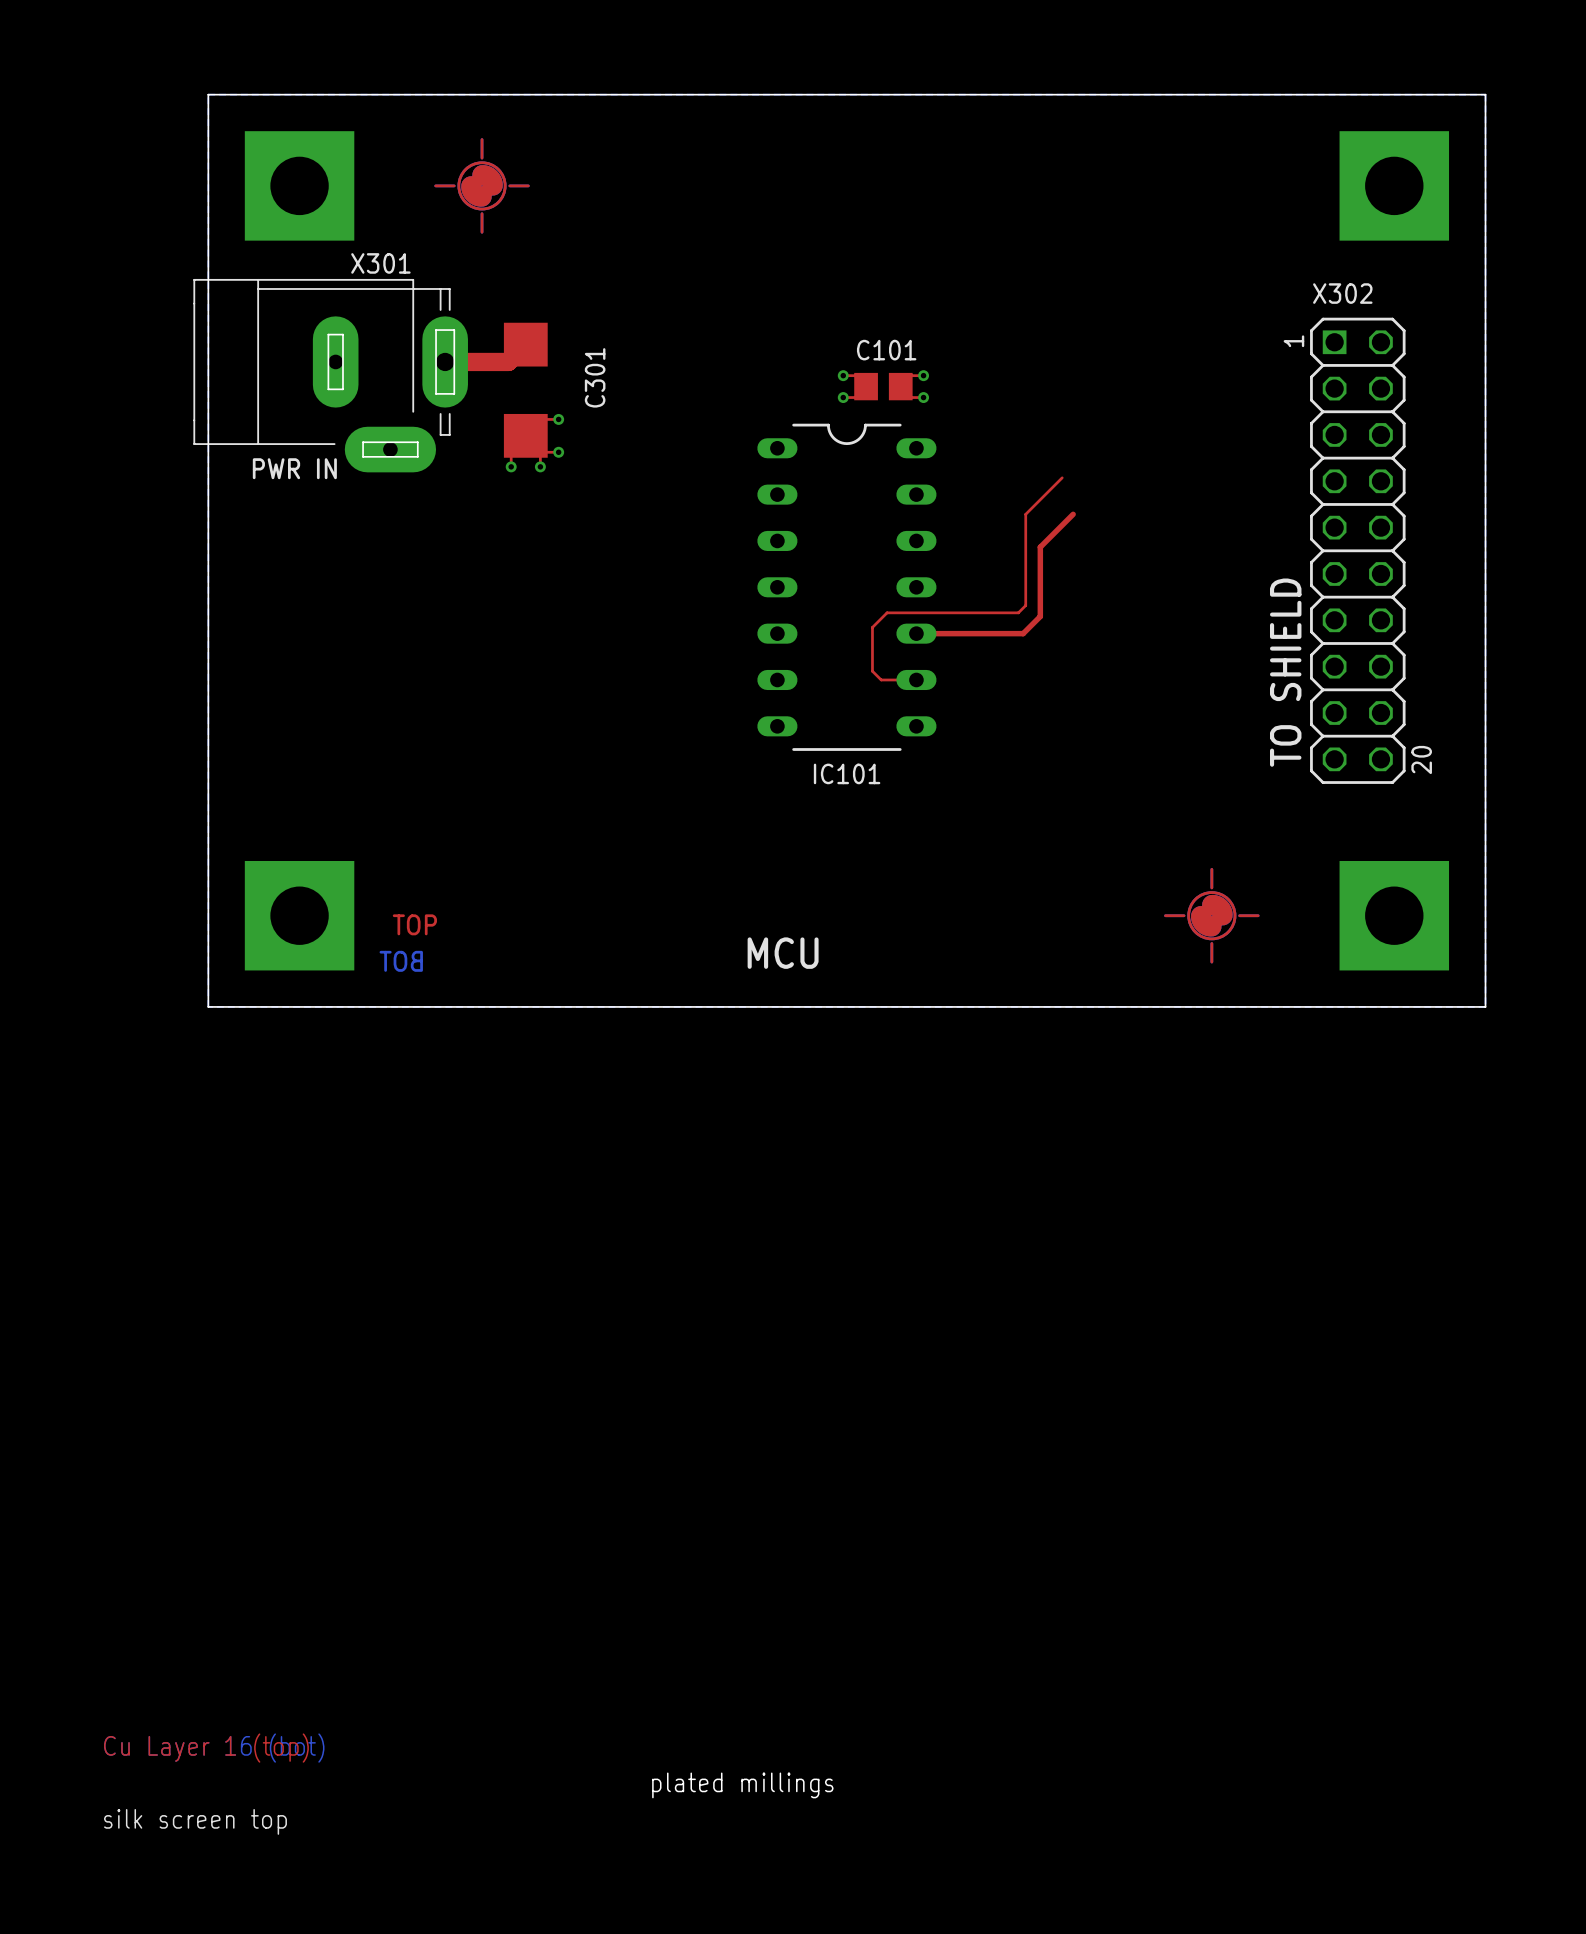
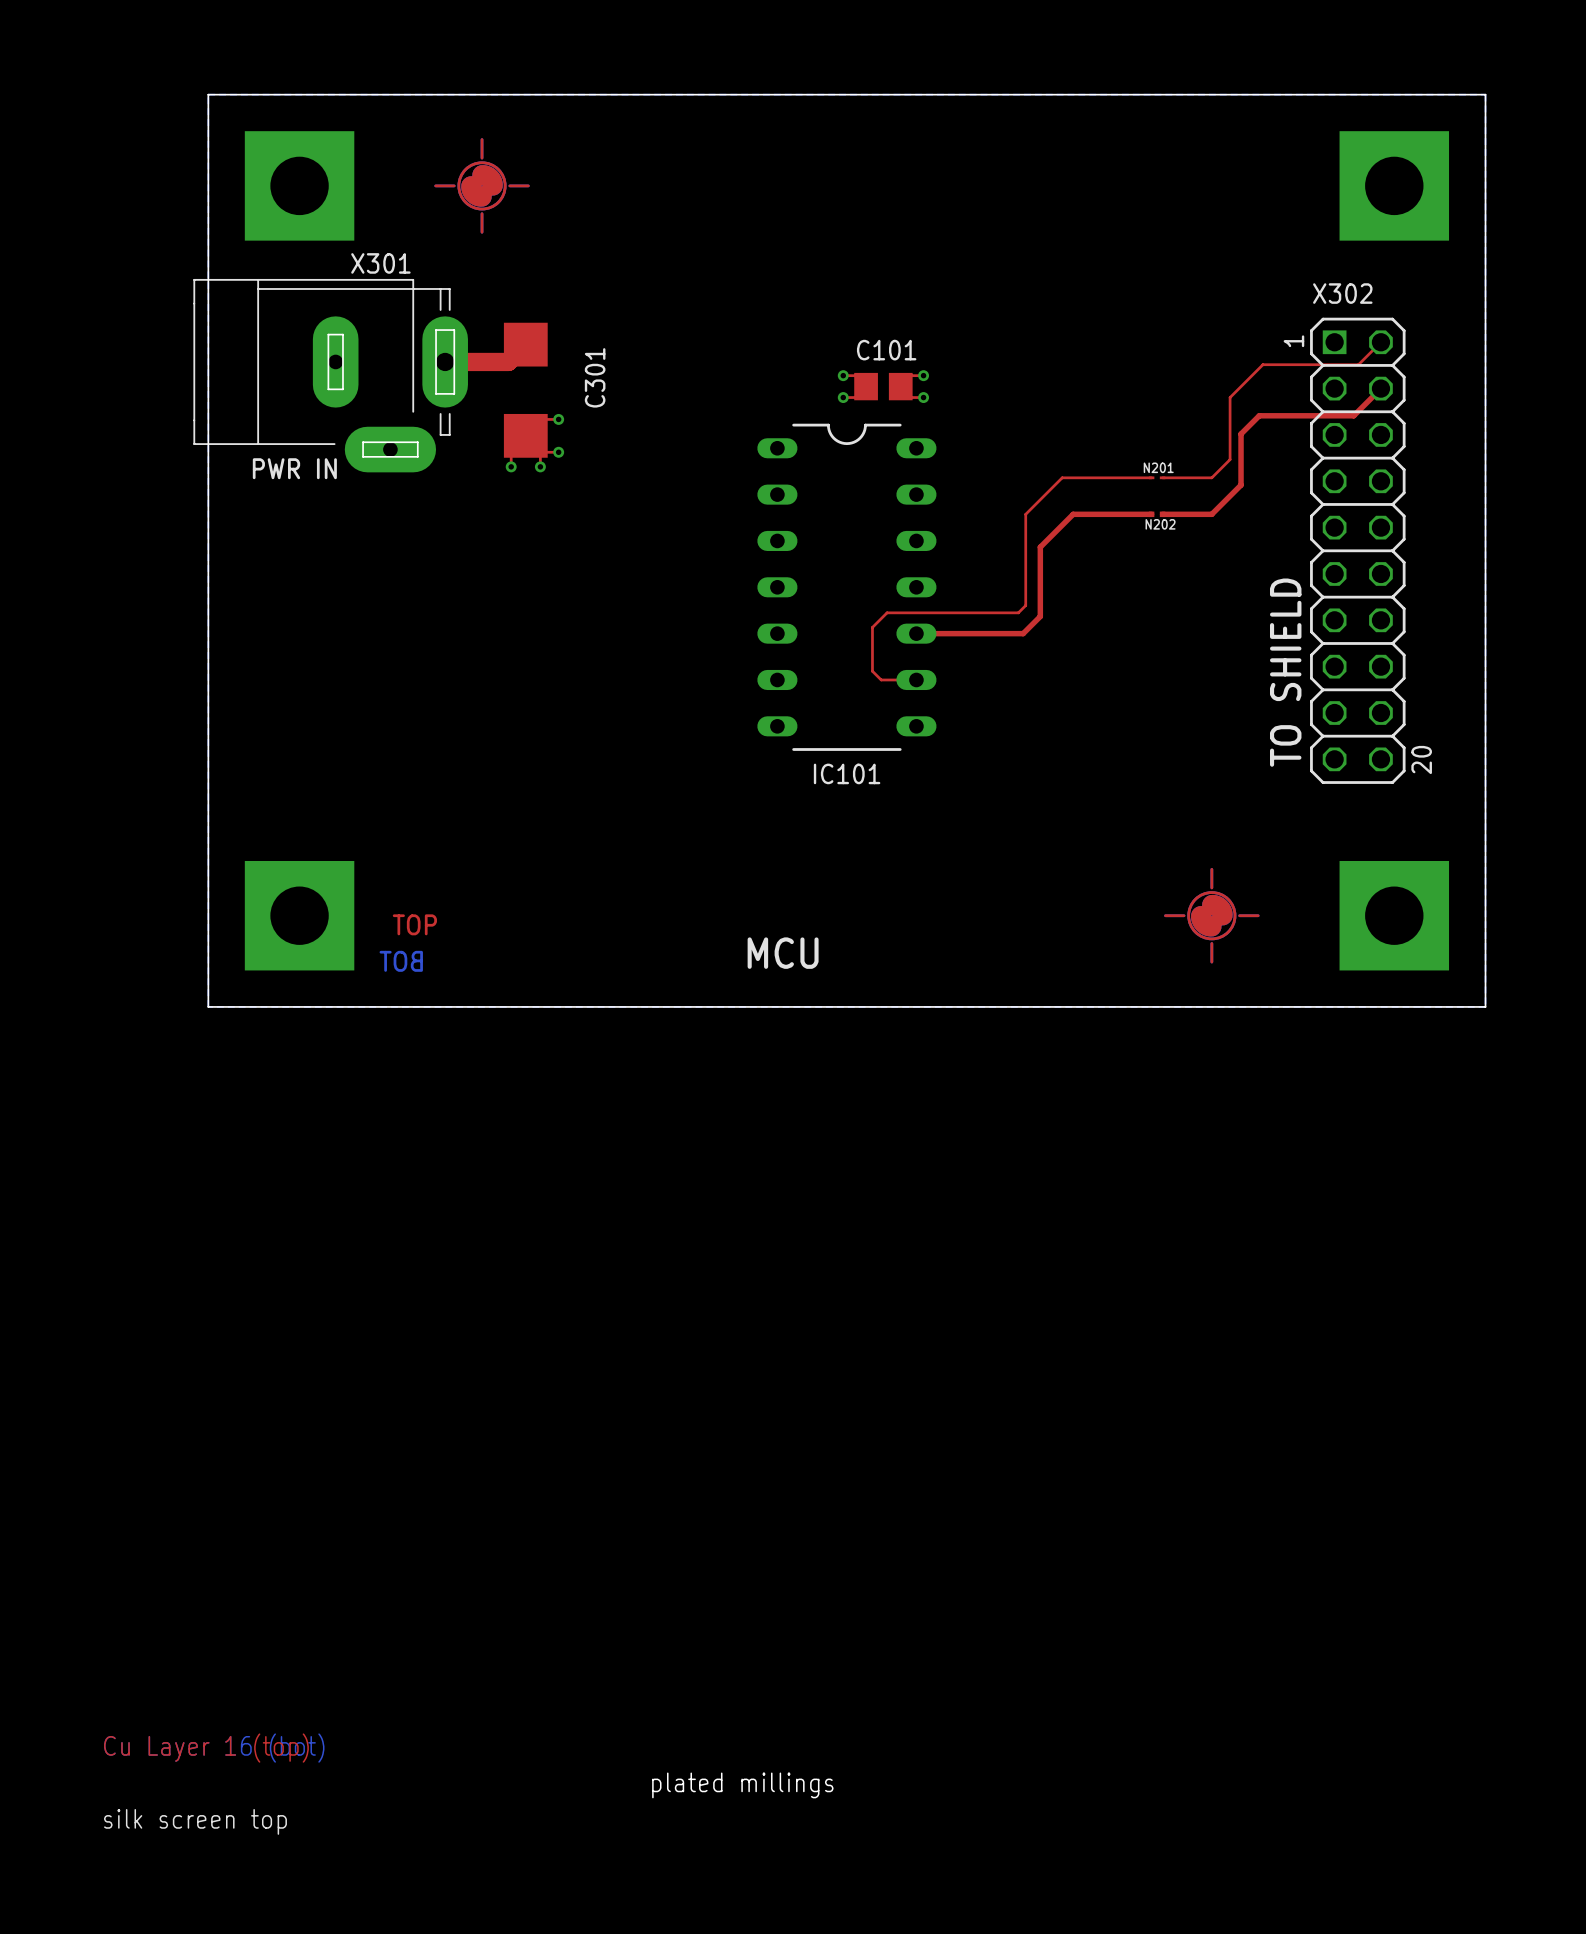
top track: none -> (1380, 342) (1358, 364) (1262, 364) (1230, 397) (1230, 459) (1211, 477) (1162, 477)
top track: none -> (1380, 388) (1353, 415) (1259, 415) (1241, 434) (1241, 485) (1211, 514) (1162, 514)
top track: none -> (1062, 477) (1151, 477)
N201: none -> (1157, 477)
top track: none -> (1073, 514) (1151, 514)
N202: none -> (1157, 514)

